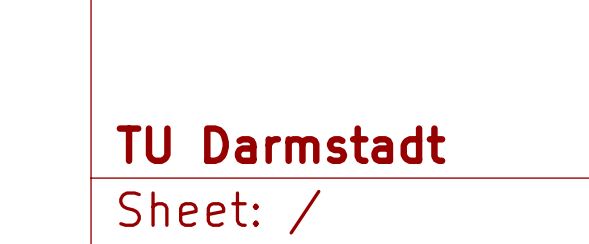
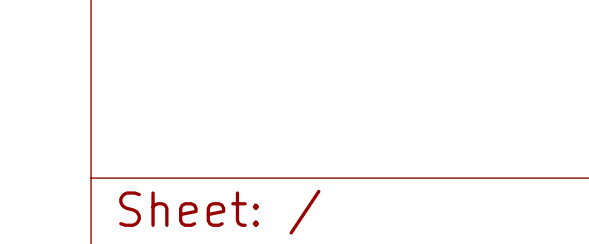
title block: TU Darmstadt (280, 144) -> none

